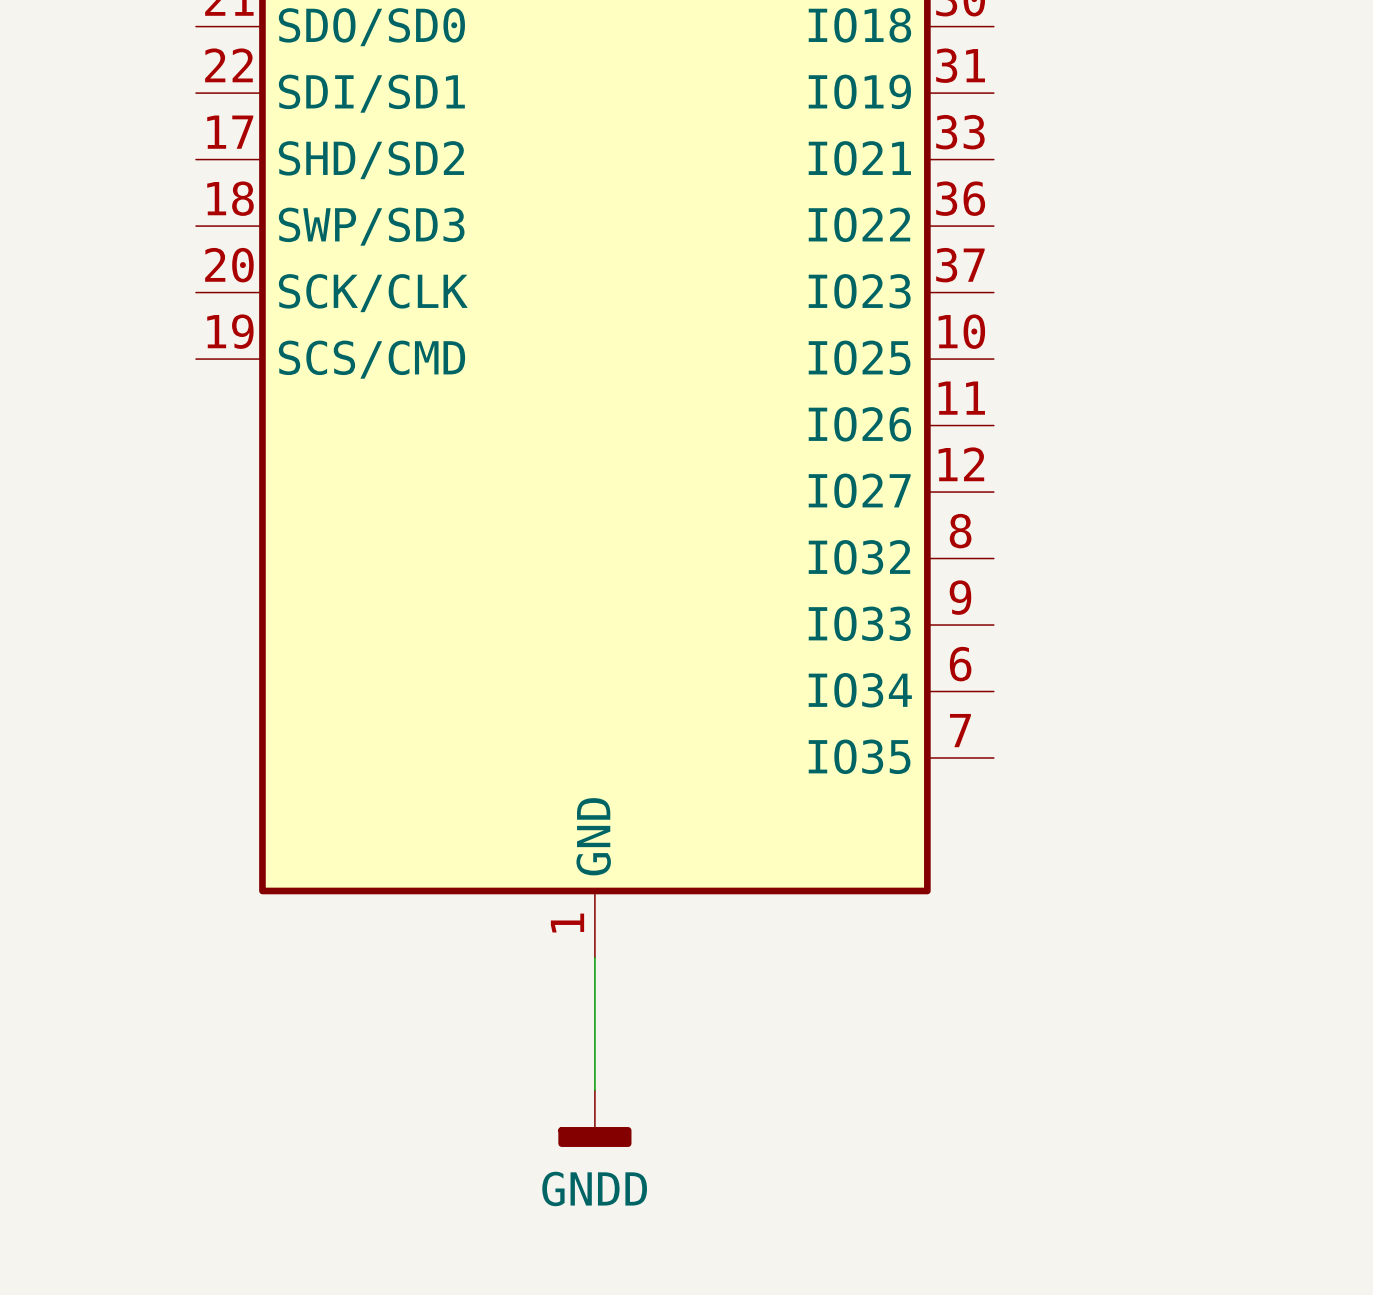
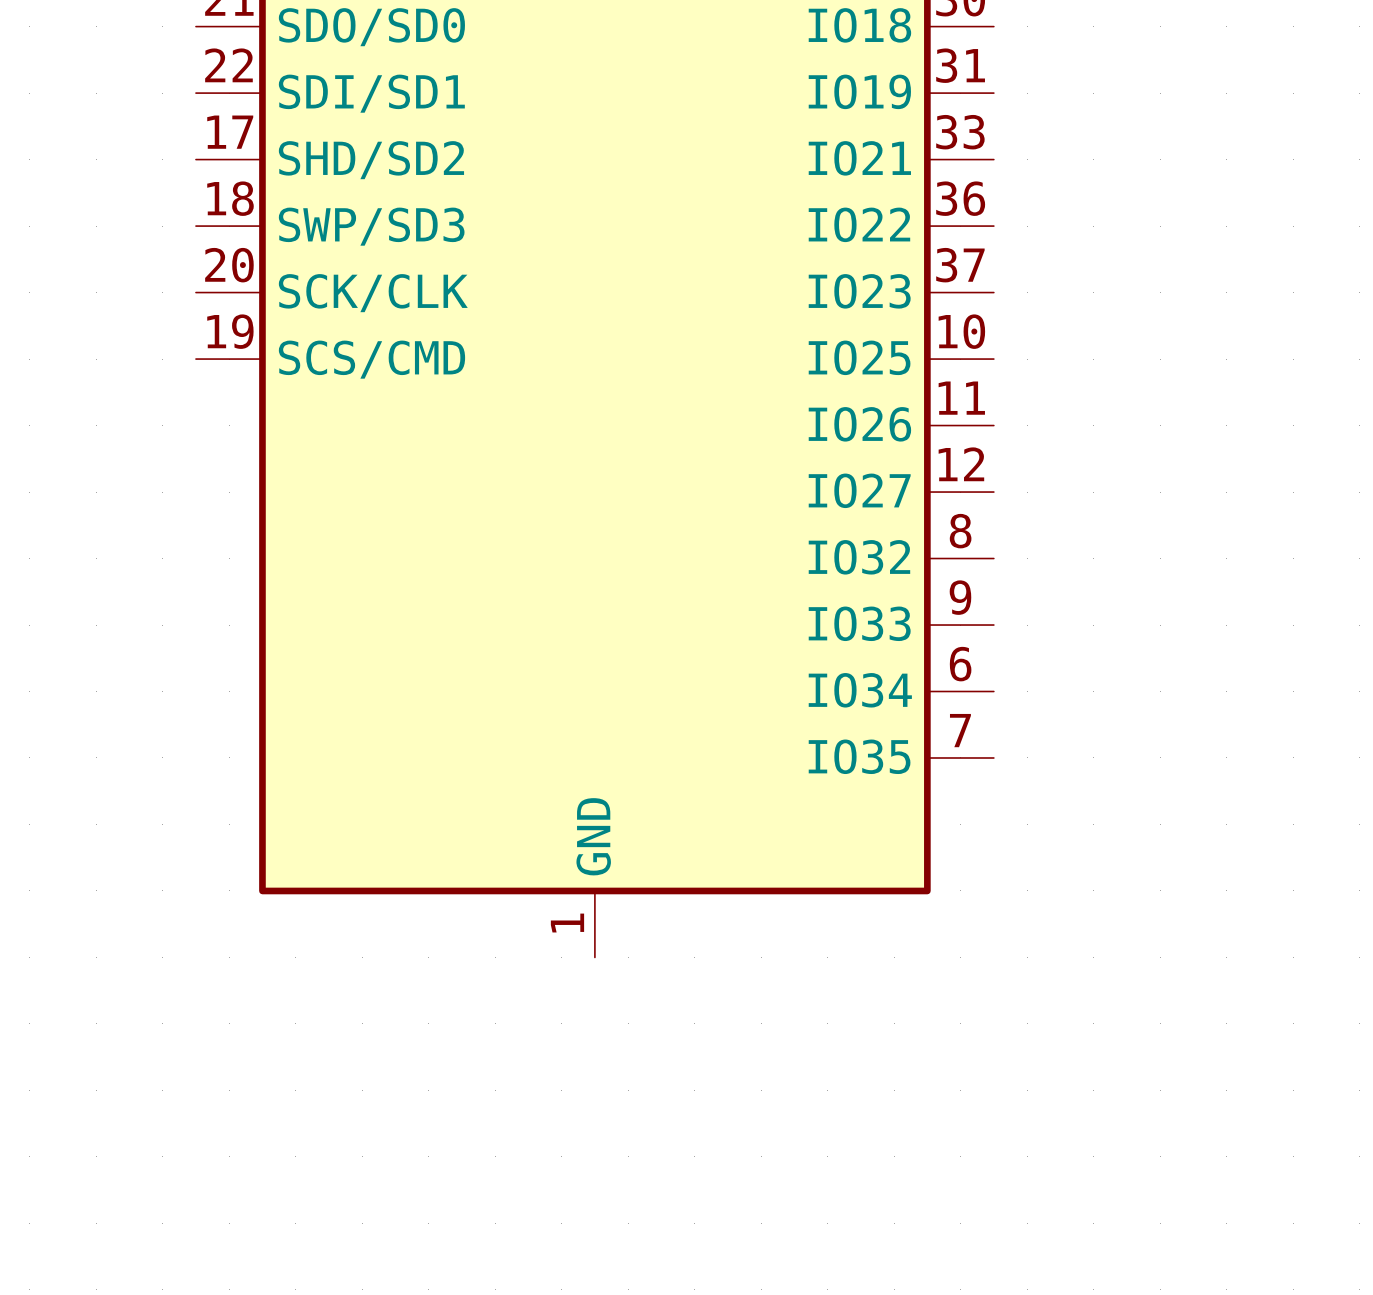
wire: (594, 957) (594, 1090) -> none
power symbol: GNDD (594, 1118) -> none

